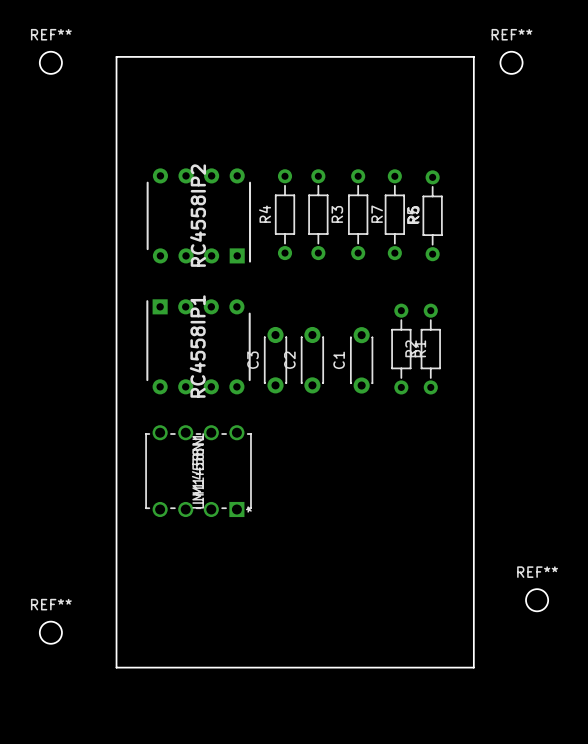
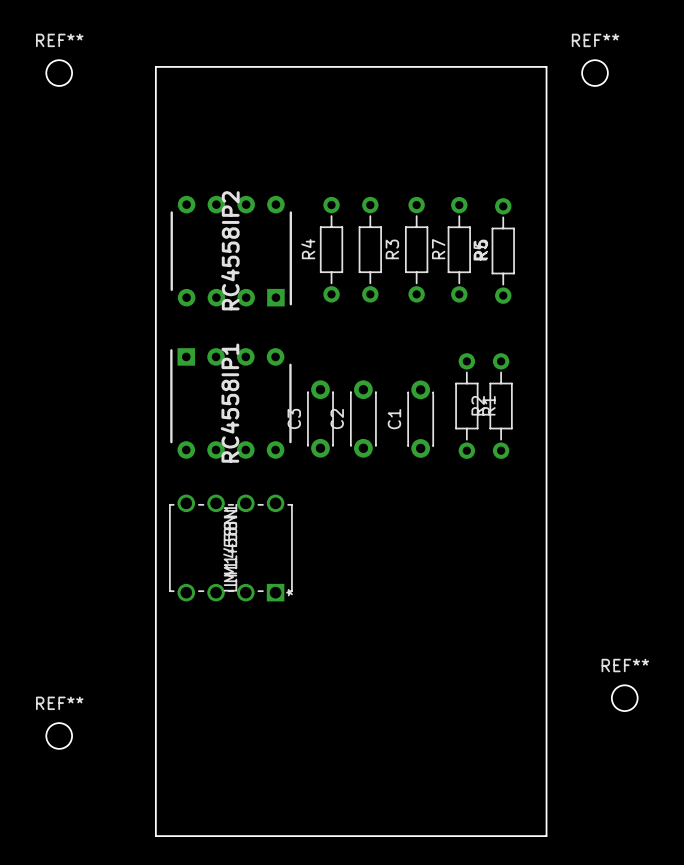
board edge: (116, 56) (116, 667) (473, 667) (473, 56) (116, 56) -> (155, 66) (155, 836) (546, 836) (546, 66) (155, 66)

